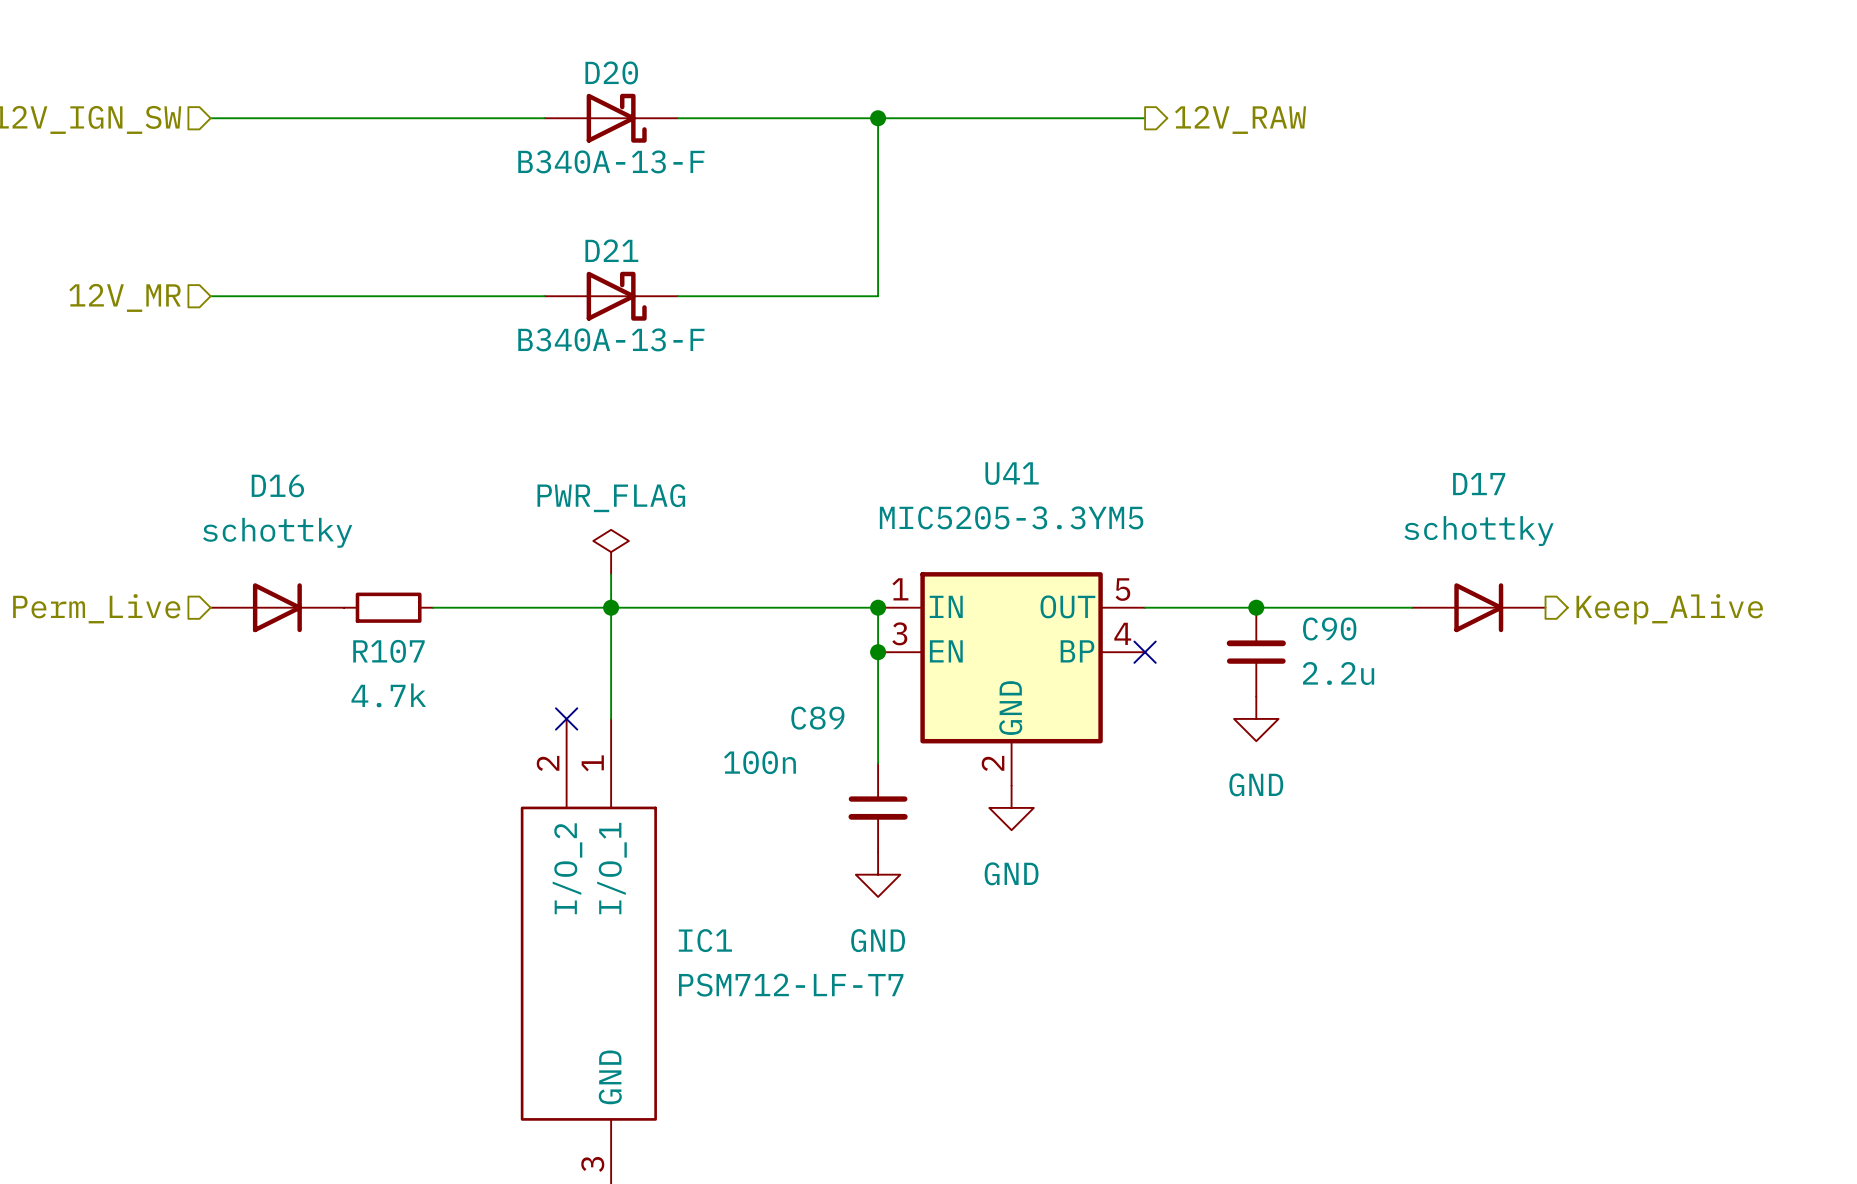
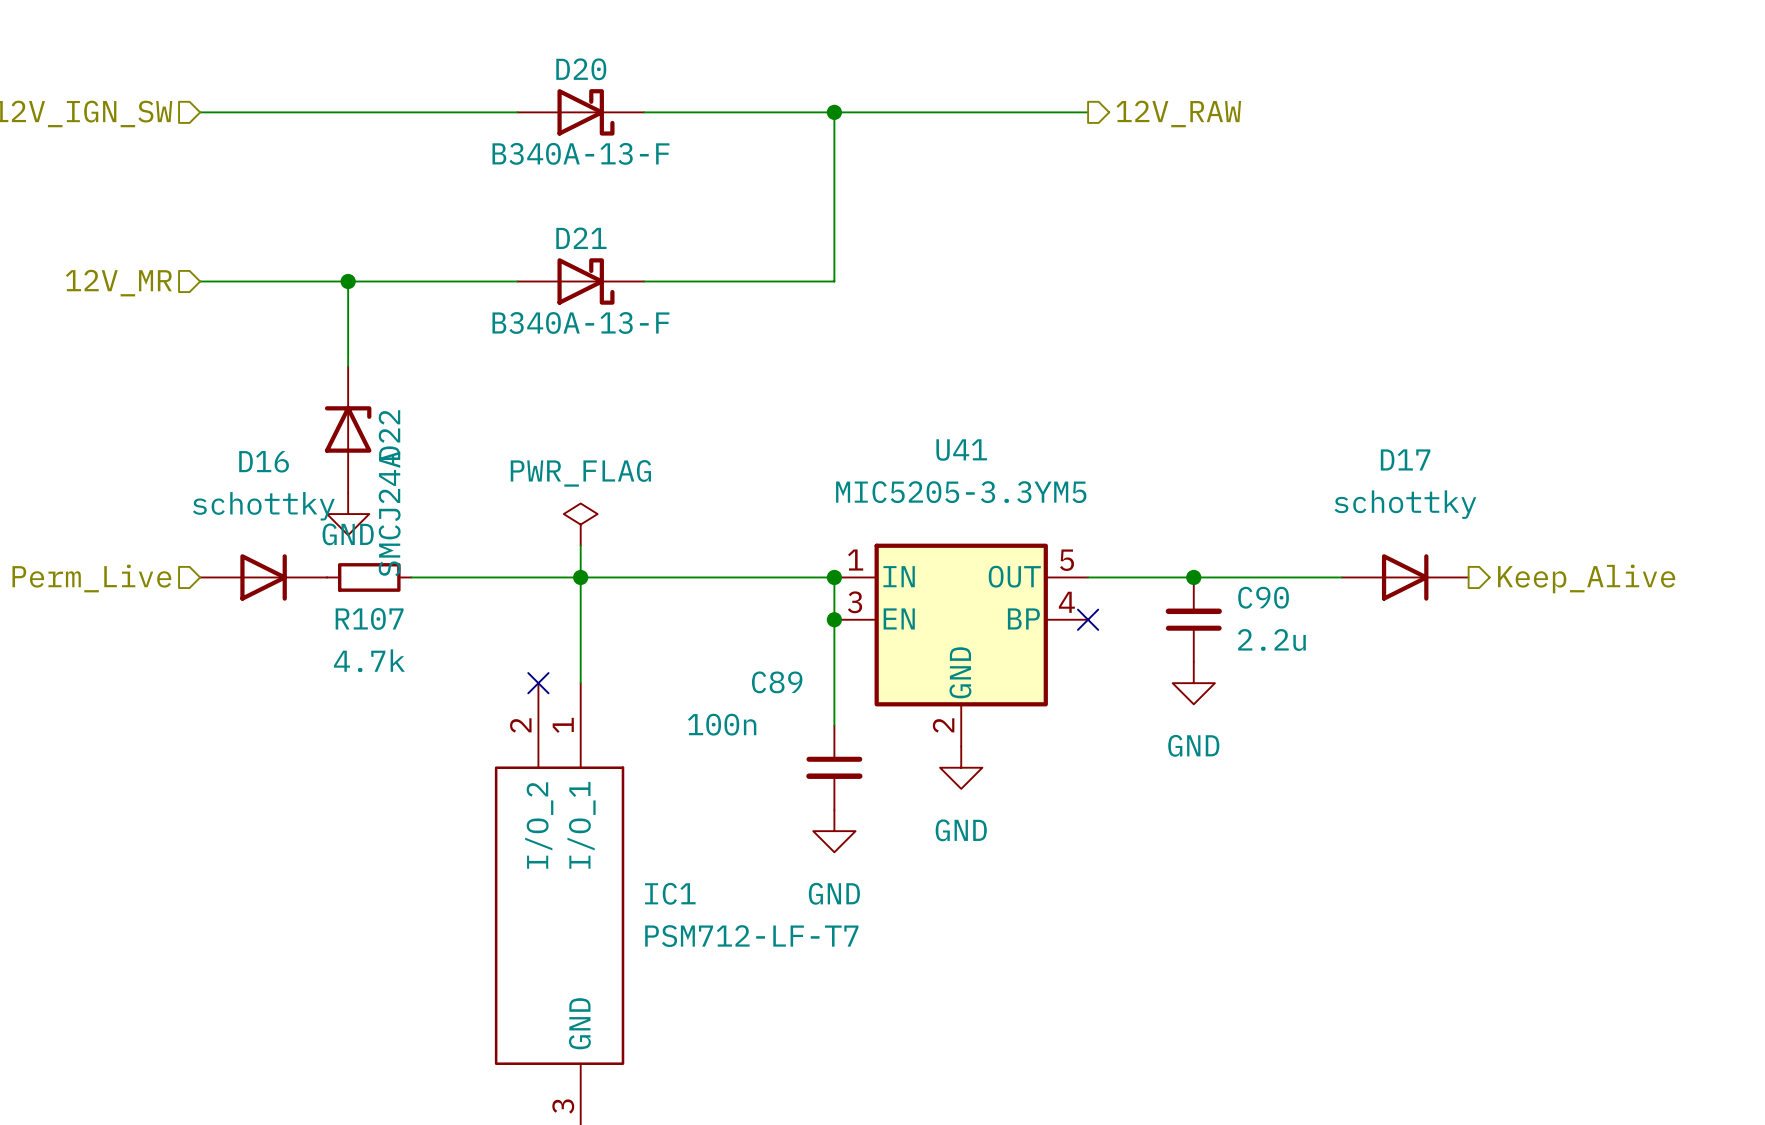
wire: none -> (348, 281) (348, 366)
junction: none -> (348, 281)
D22: none -> SMCJ24A (348, 429)
power symbol: none -> GND (348, 514)

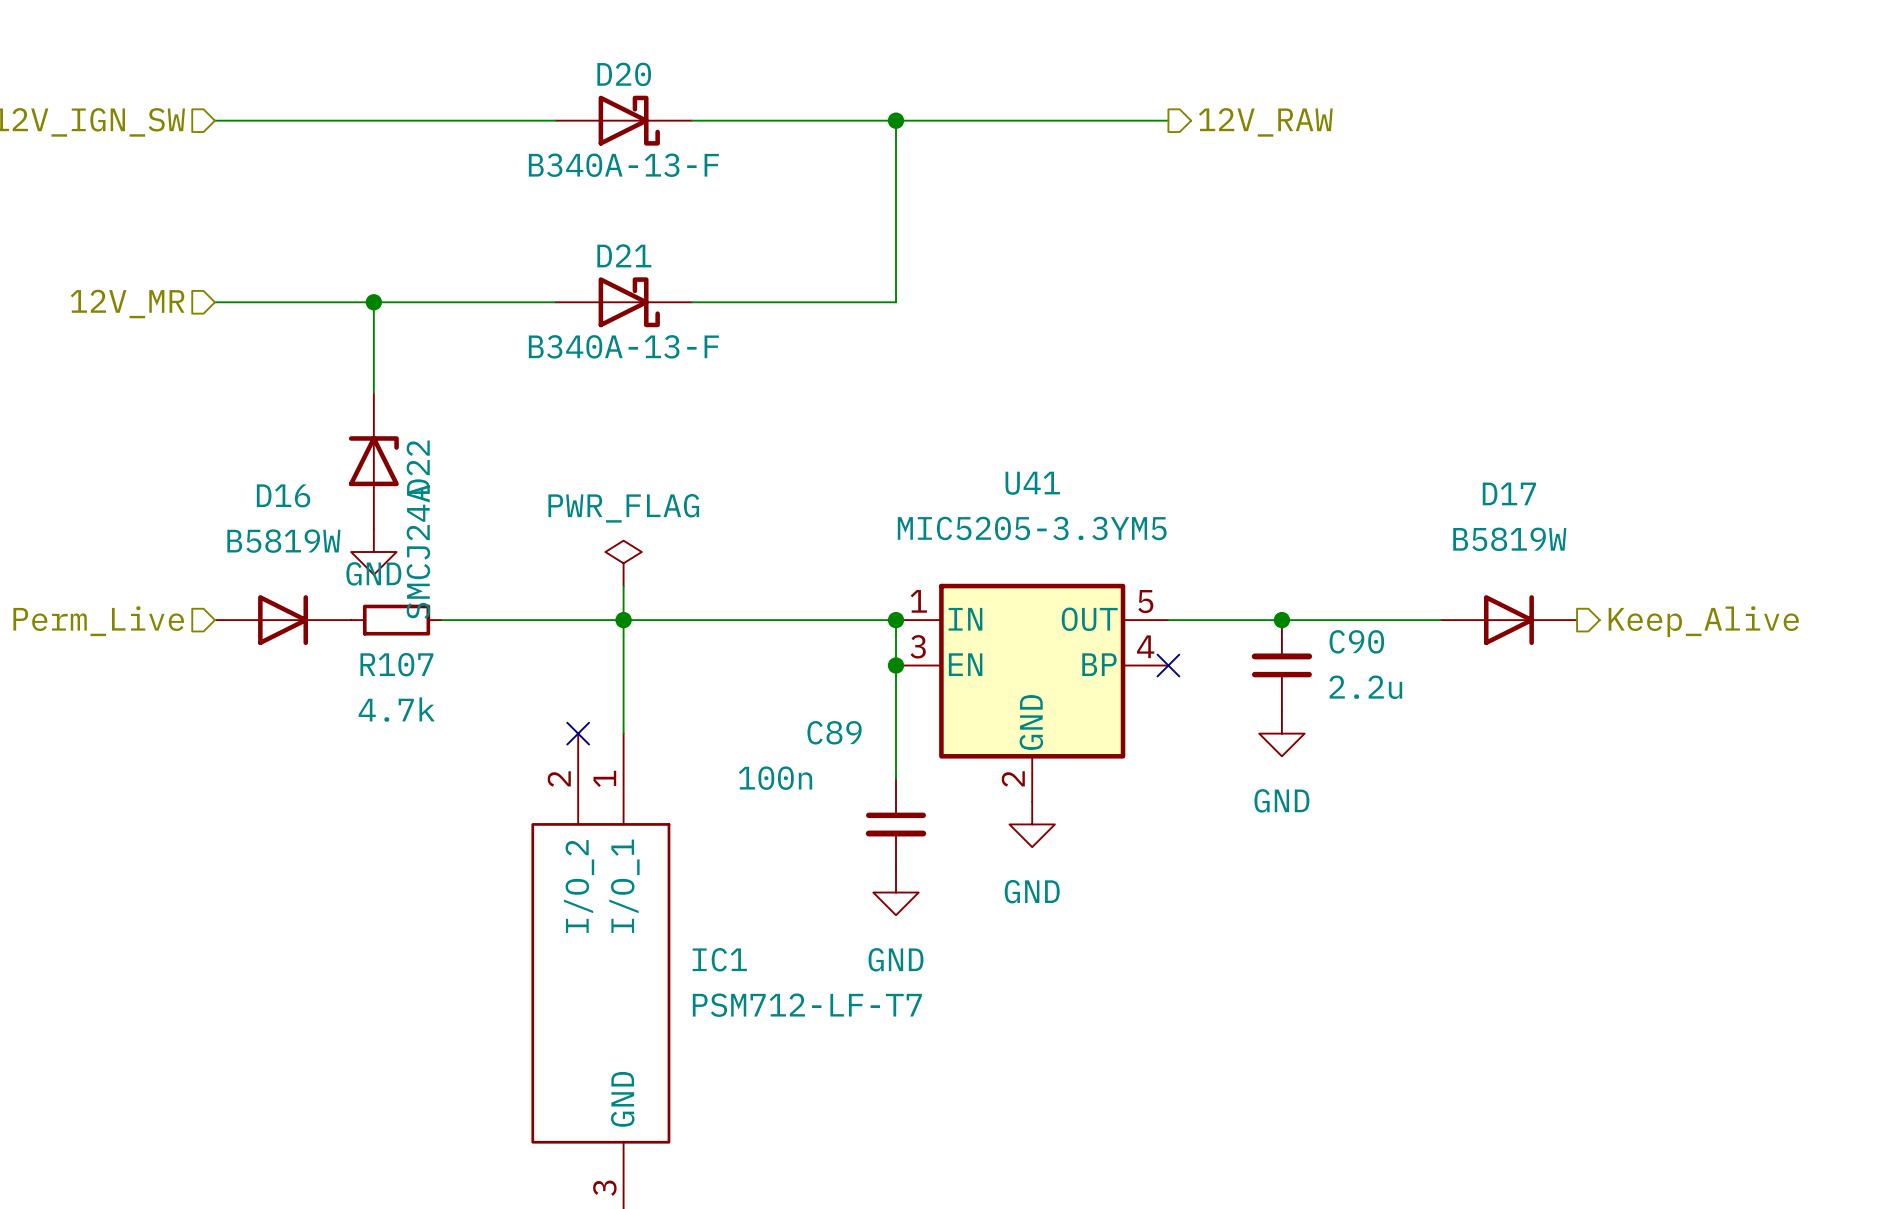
D17 value: schottky (1405, 504) -> B5819W (1509, 539)
D16 value: schottky (263, 506) -> B5819W (283, 541)

